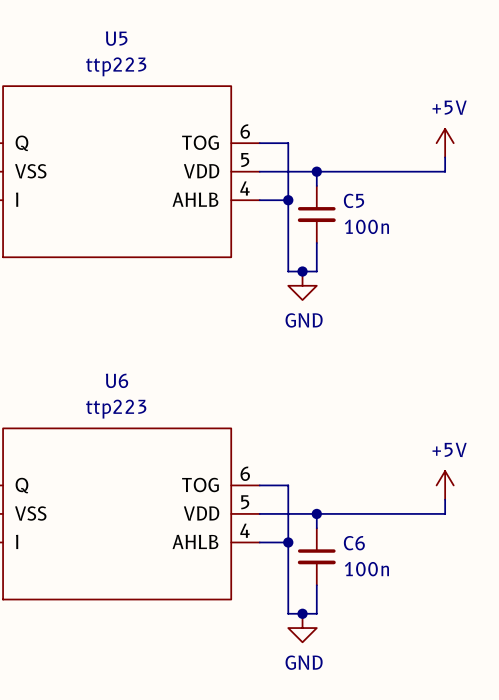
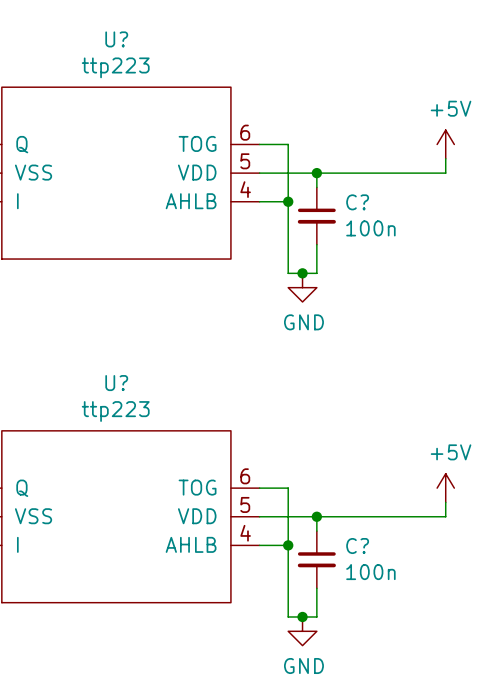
U5 name: U5 (116, 38) -> U? (116, 39)
C5 name: C5 (354, 200) -> C? (357, 202)
U6 name: U6 (117, 380) -> U? (116, 383)
C6 name: C6 (354, 543) -> C? (357, 546)

